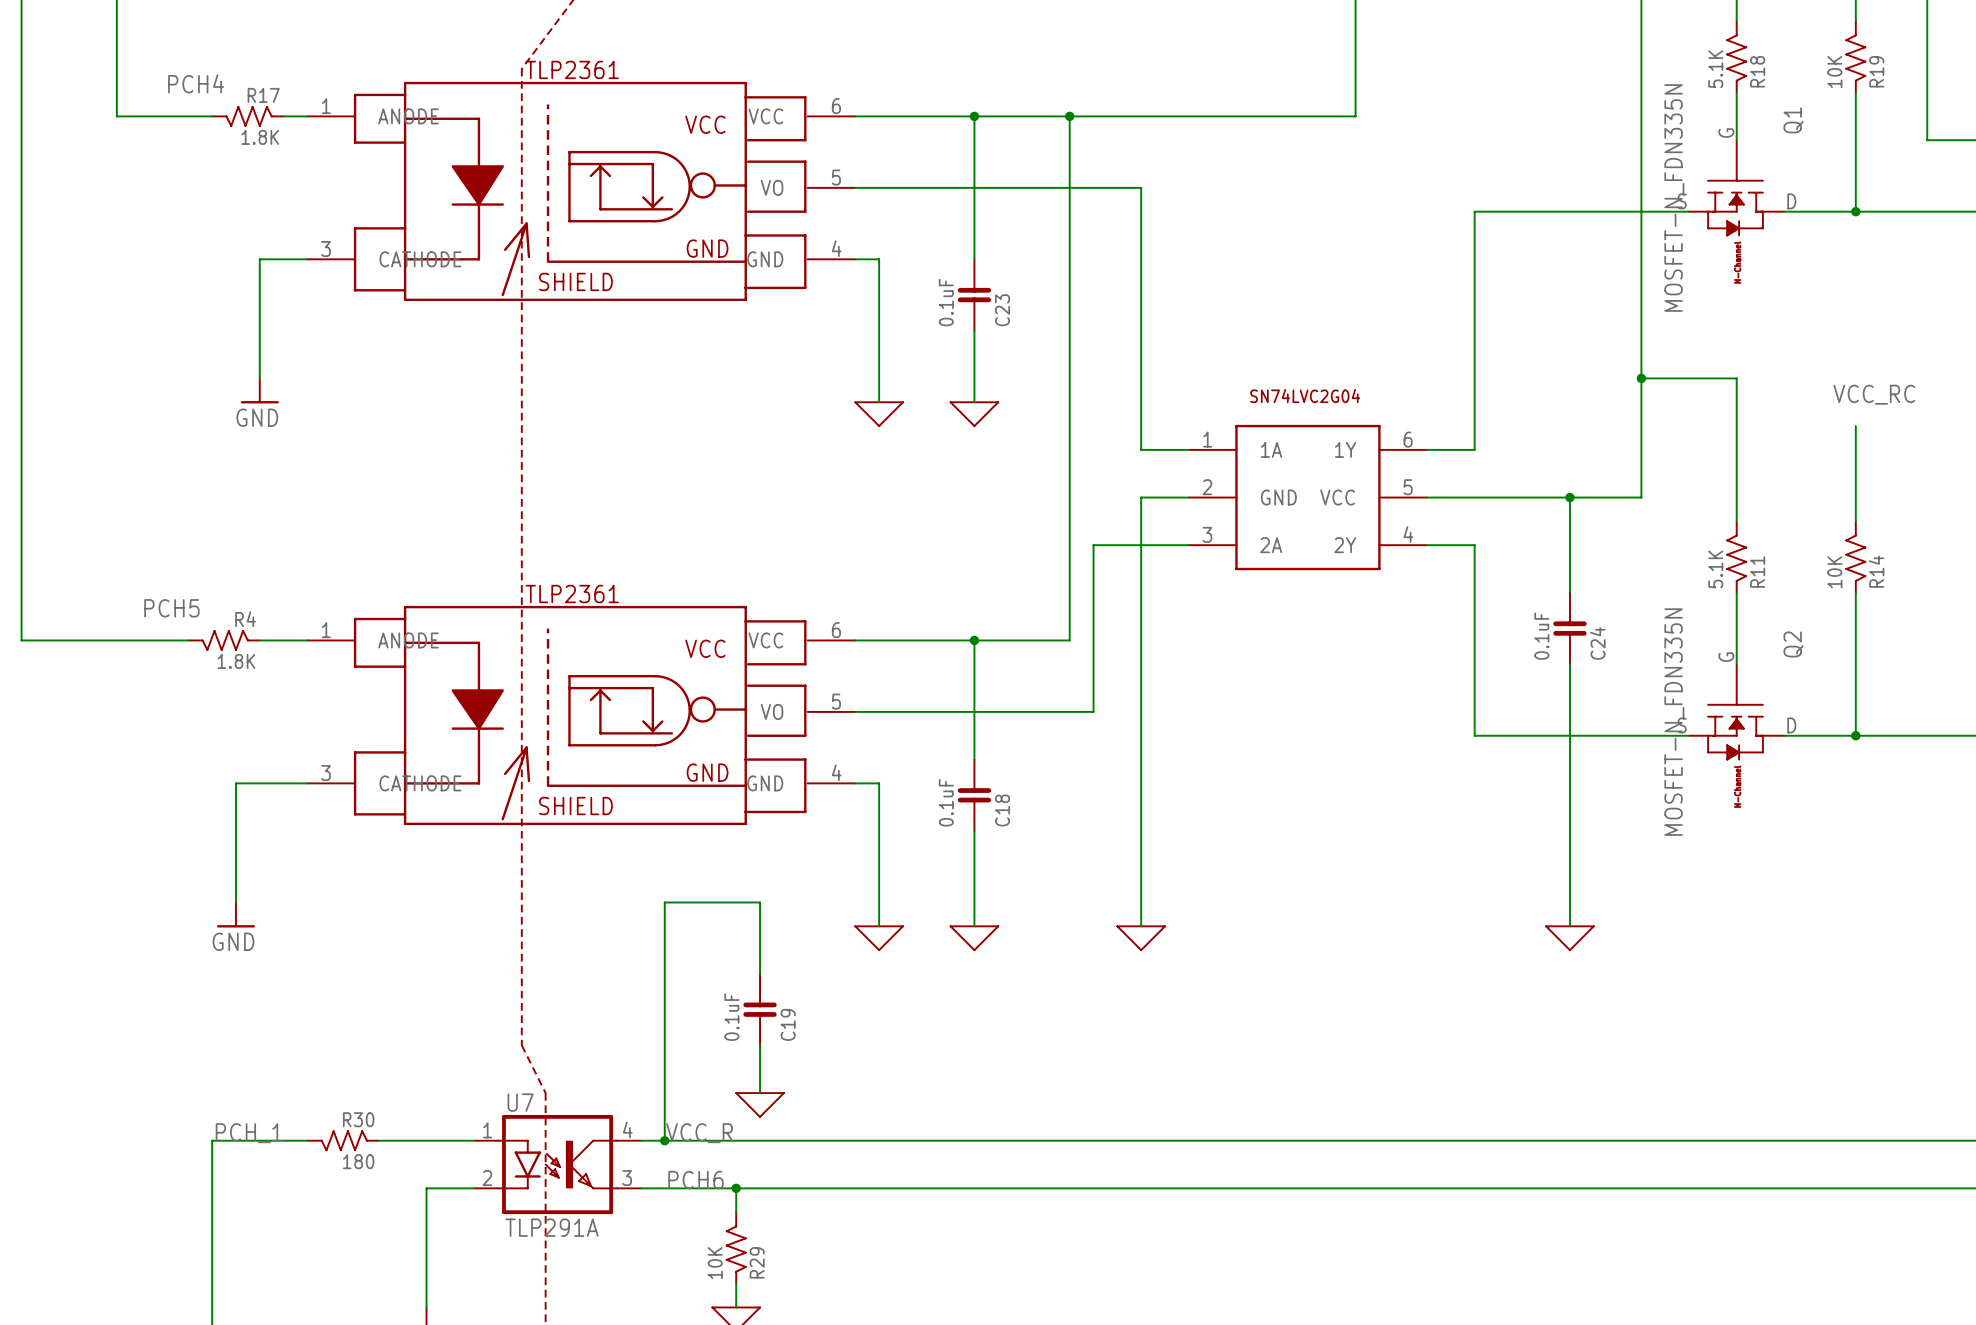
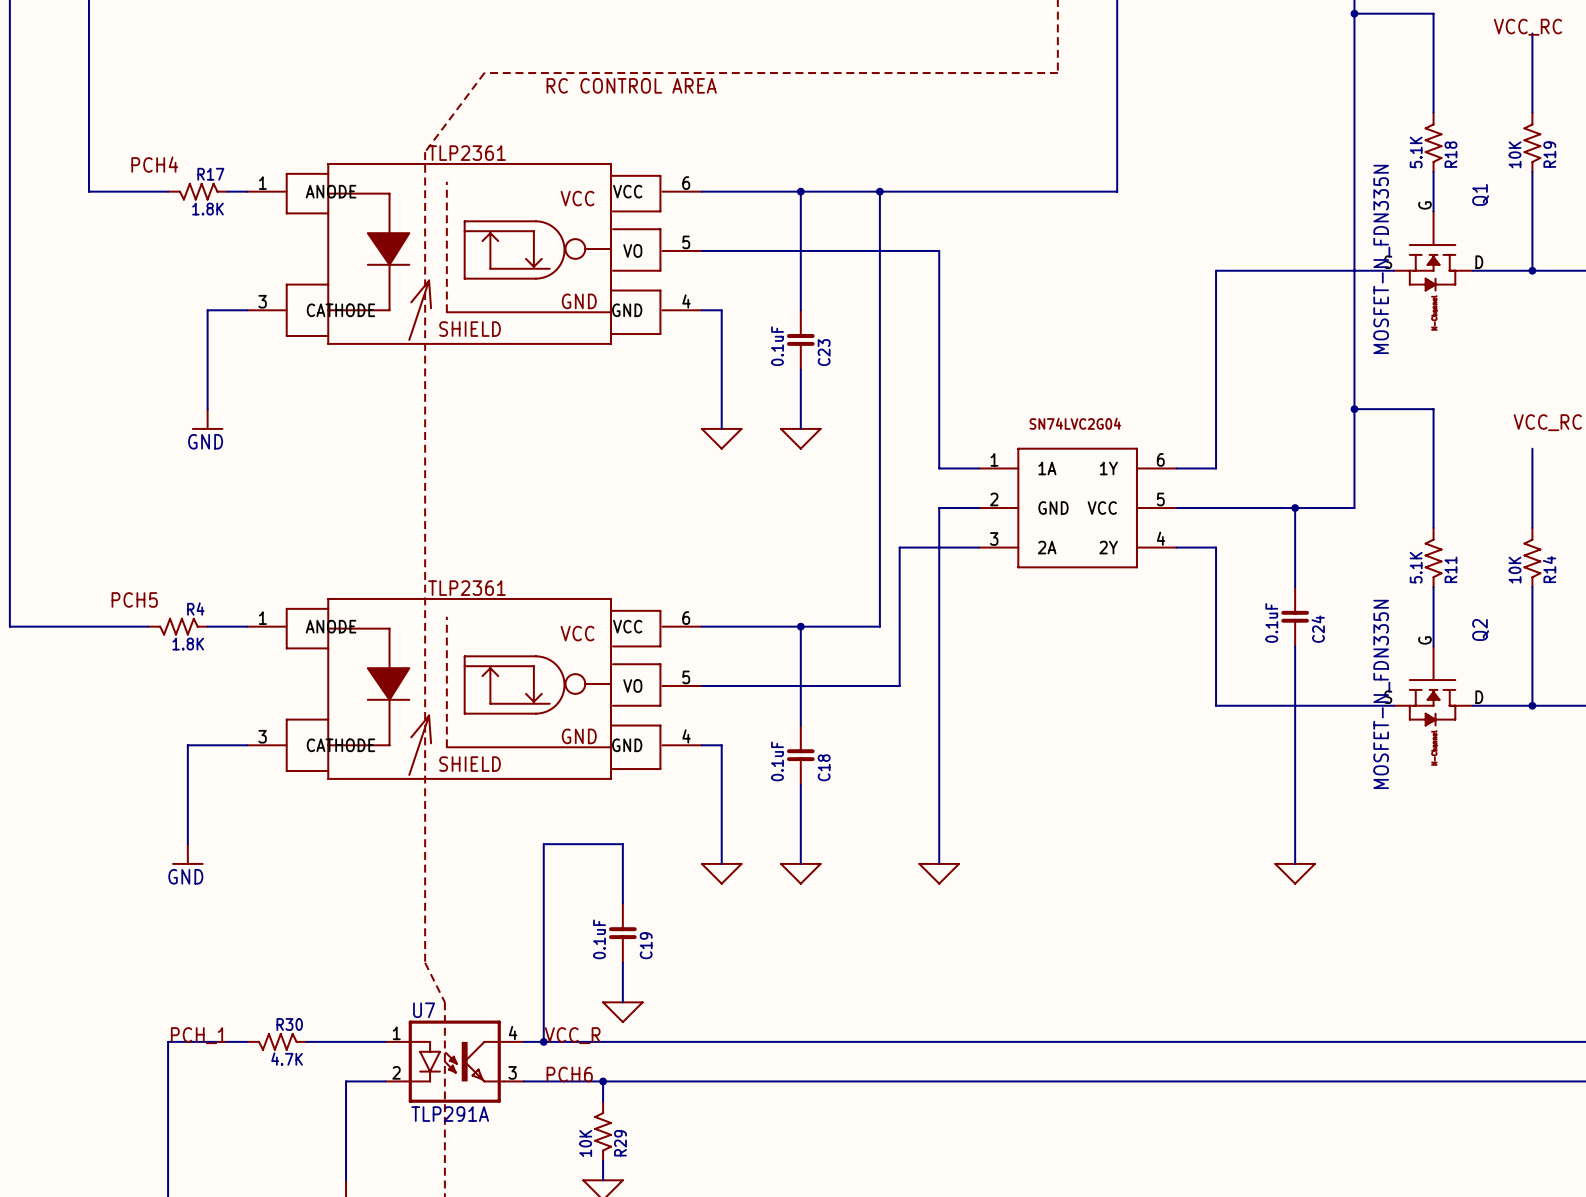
R30 value: 180 (358, 1161) -> 4.7K (287, 1059)

